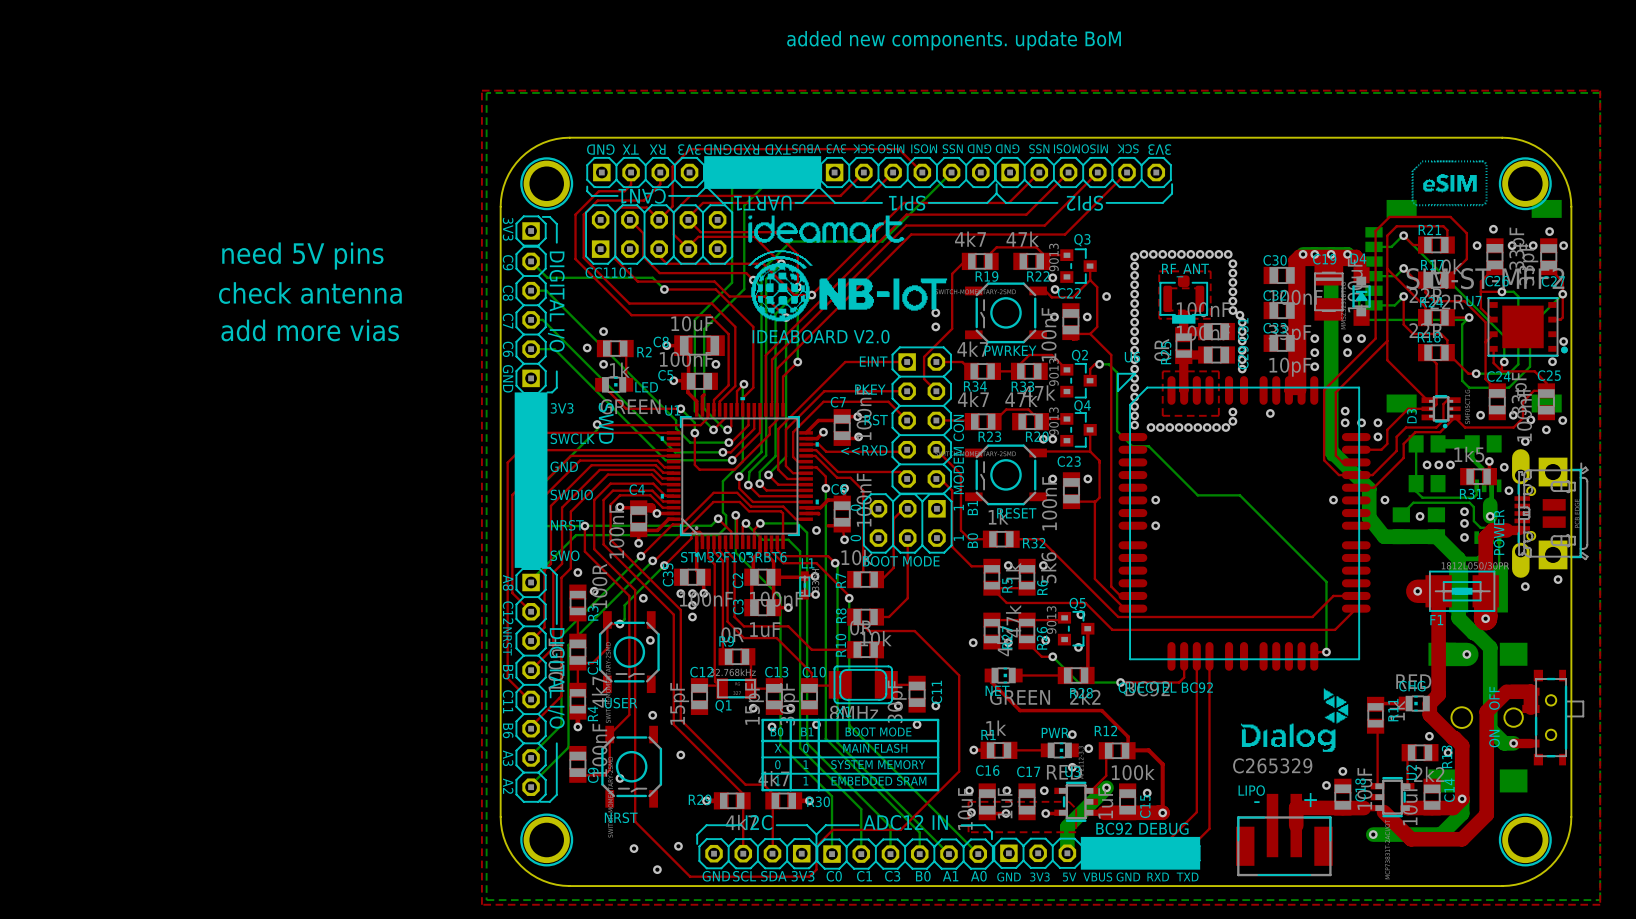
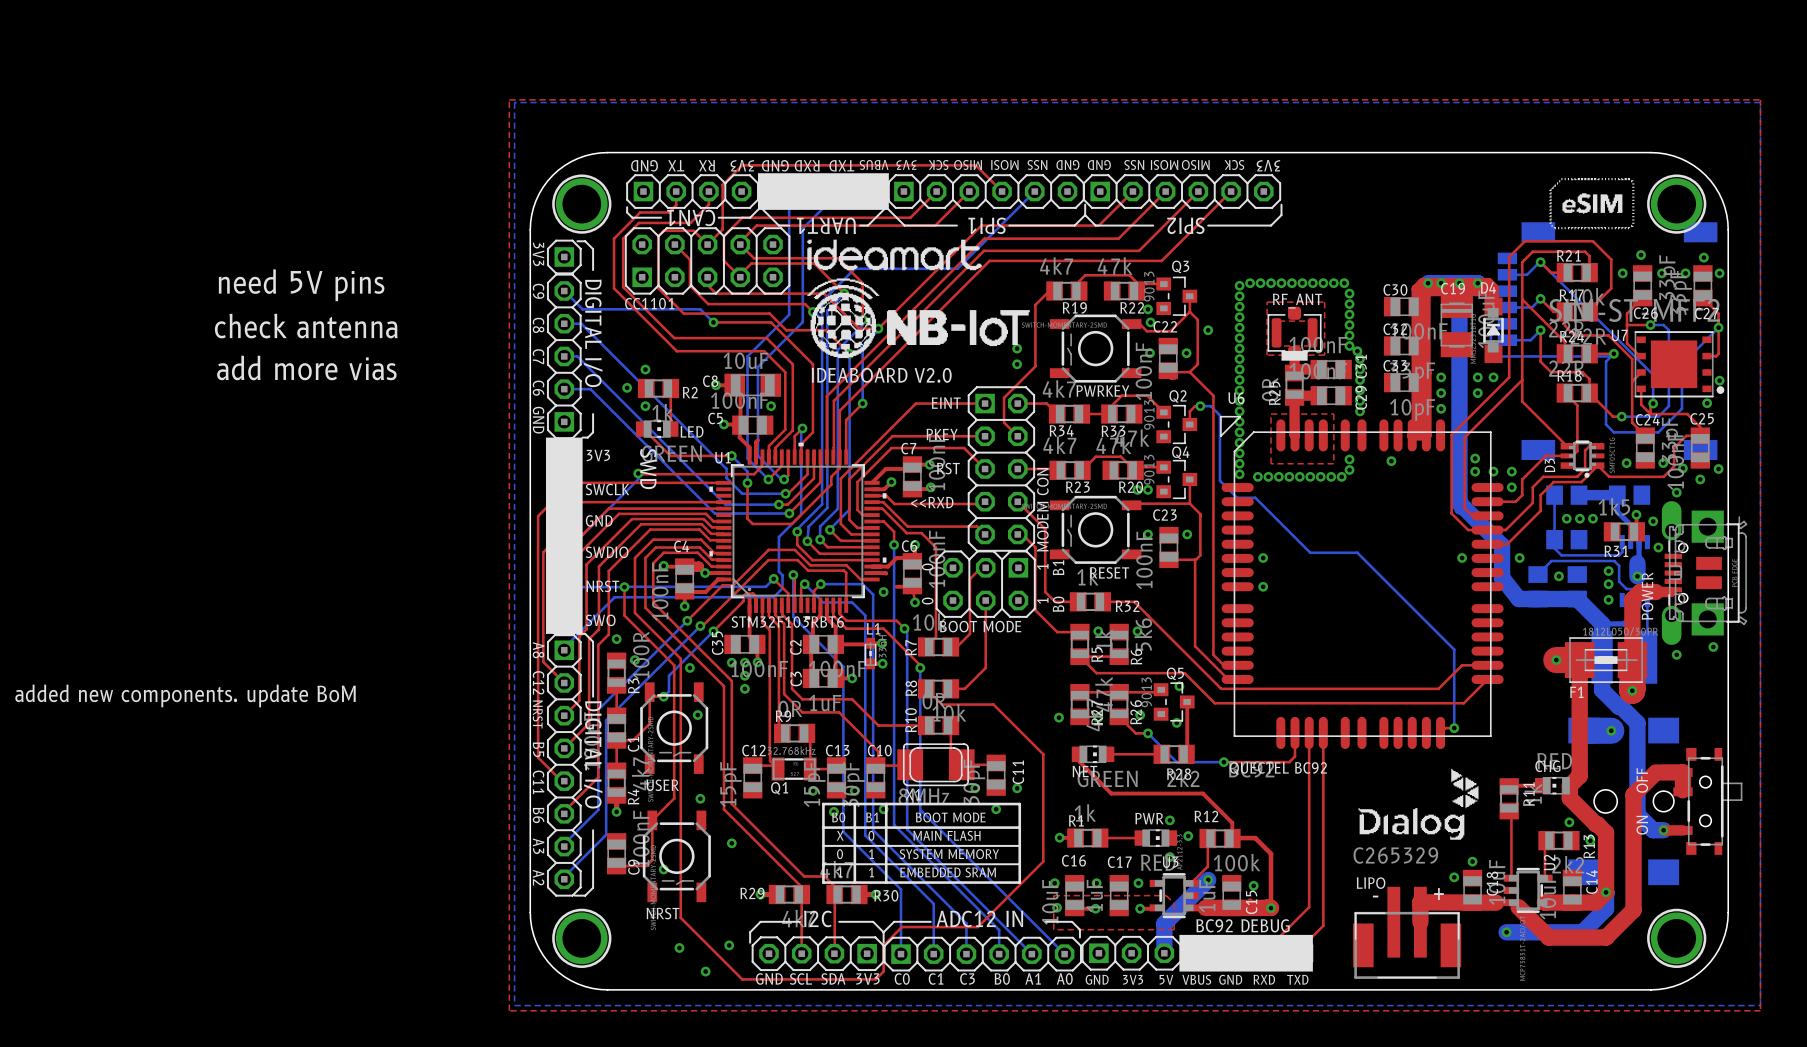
text: added new components. update BoM (954, 40) -> none
text: none -> added new components. update BoM (185, 695)

